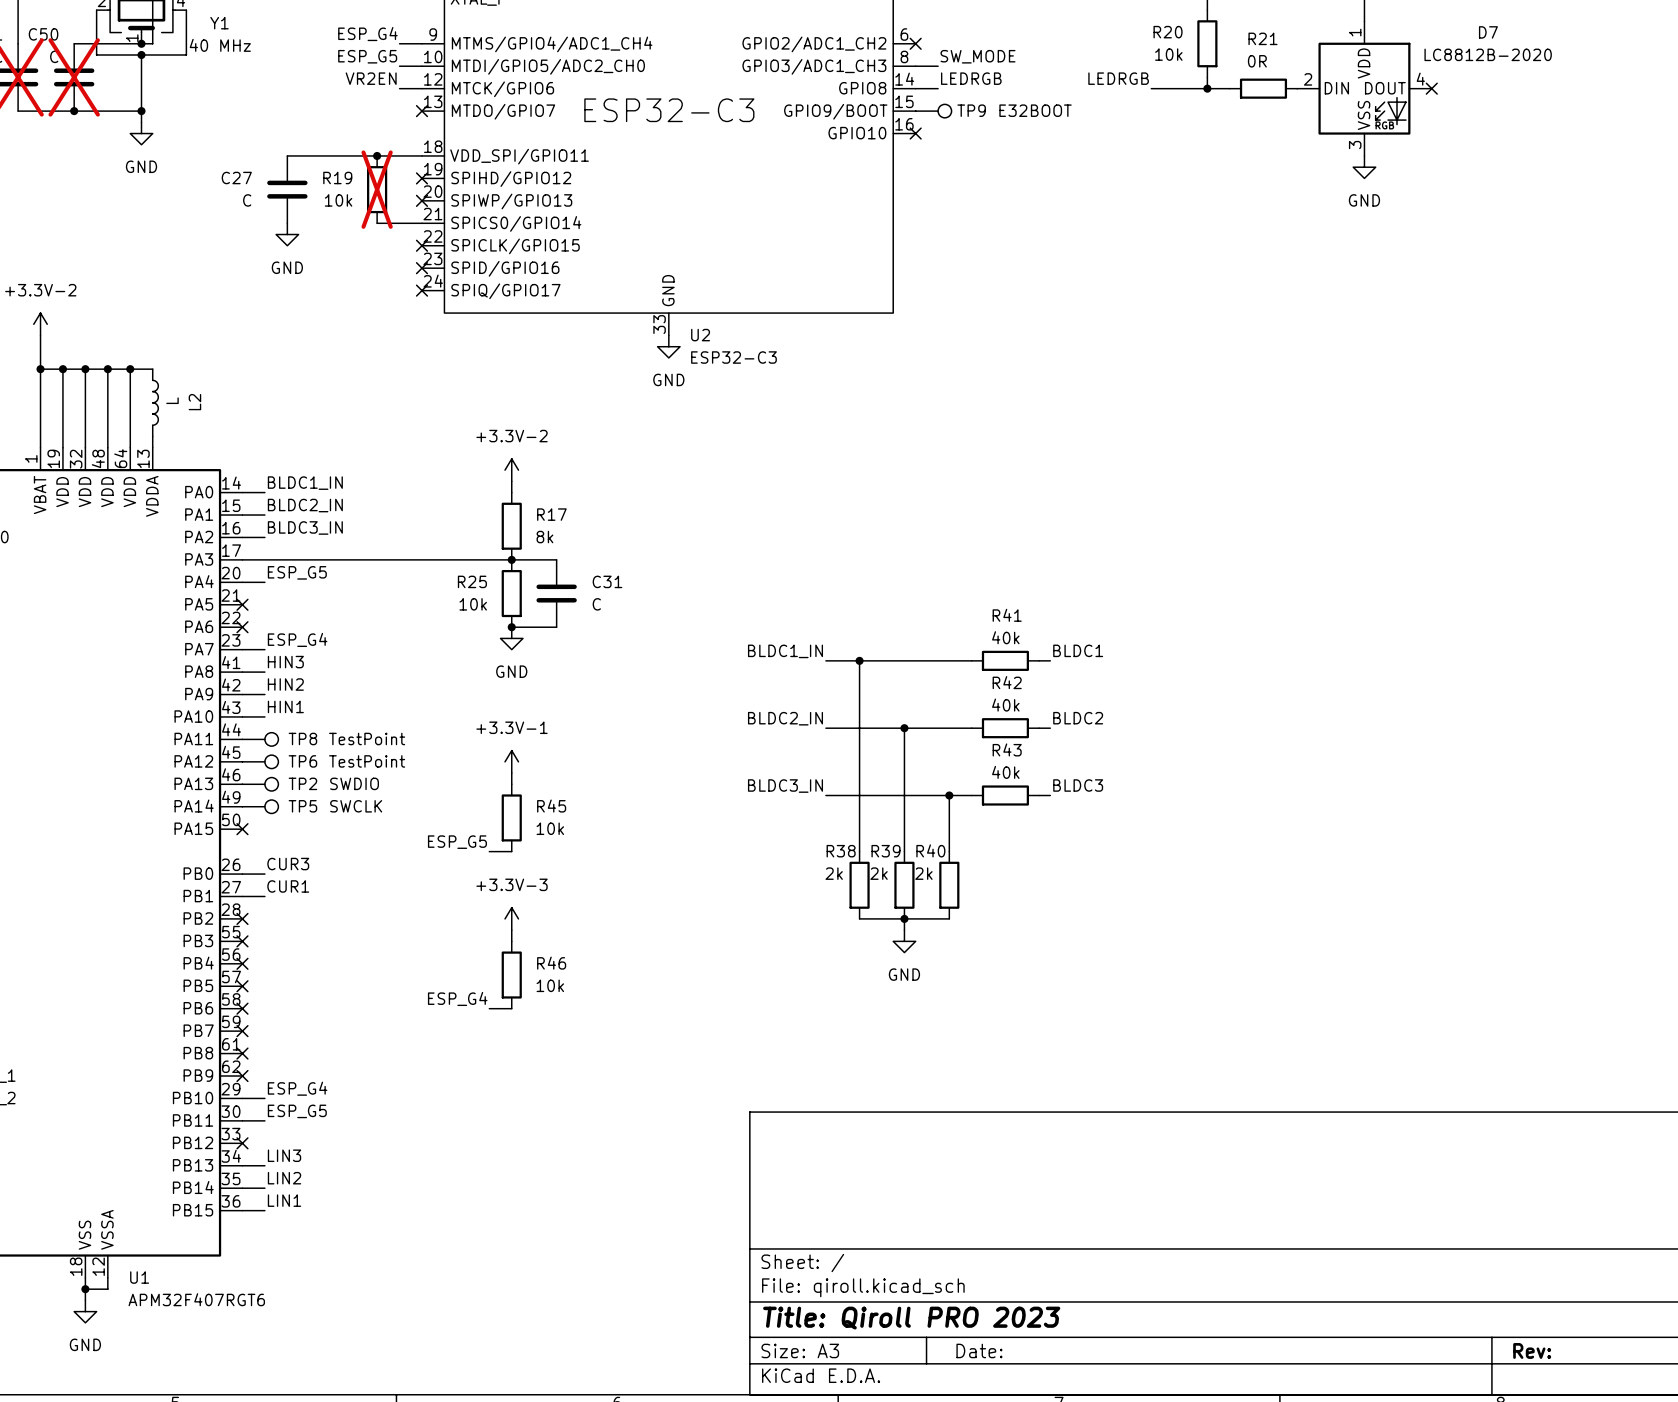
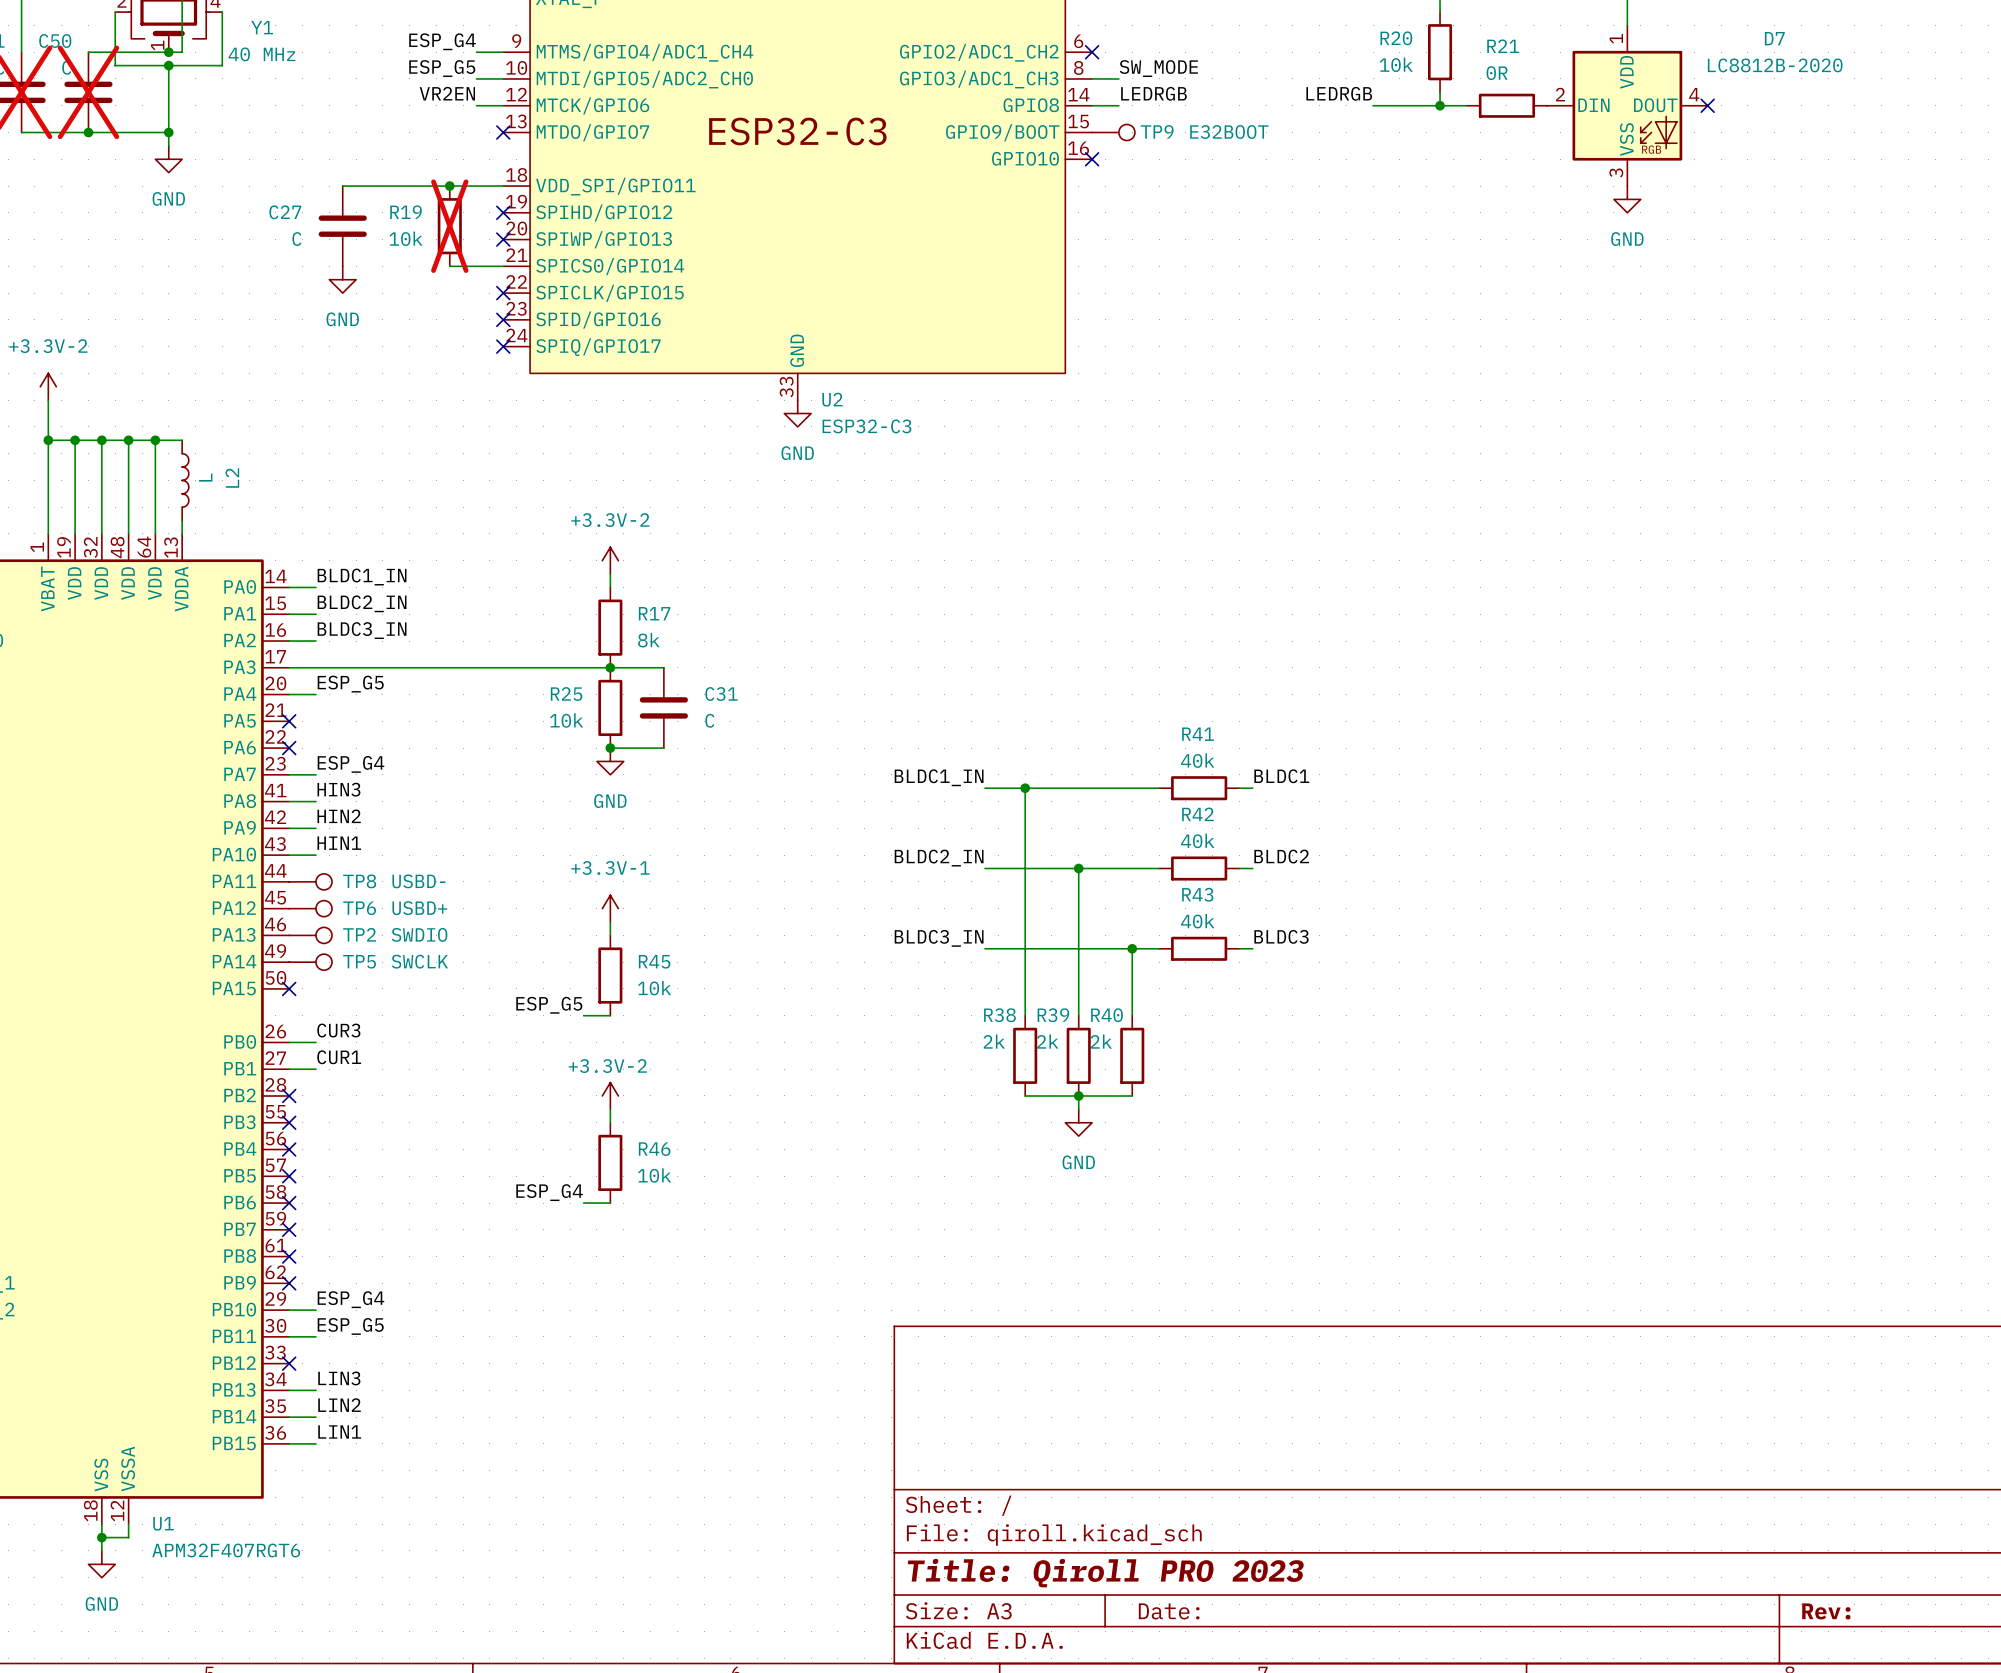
TP8 value: TestPoint (367, 738) -> USBD- (418, 881)
TP6 value: TestPoint (367, 761) -> USBD+ (419, 908)
power symbol: +3.3V-3 (511, 918) -> +3.3V-2 (610, 1095)

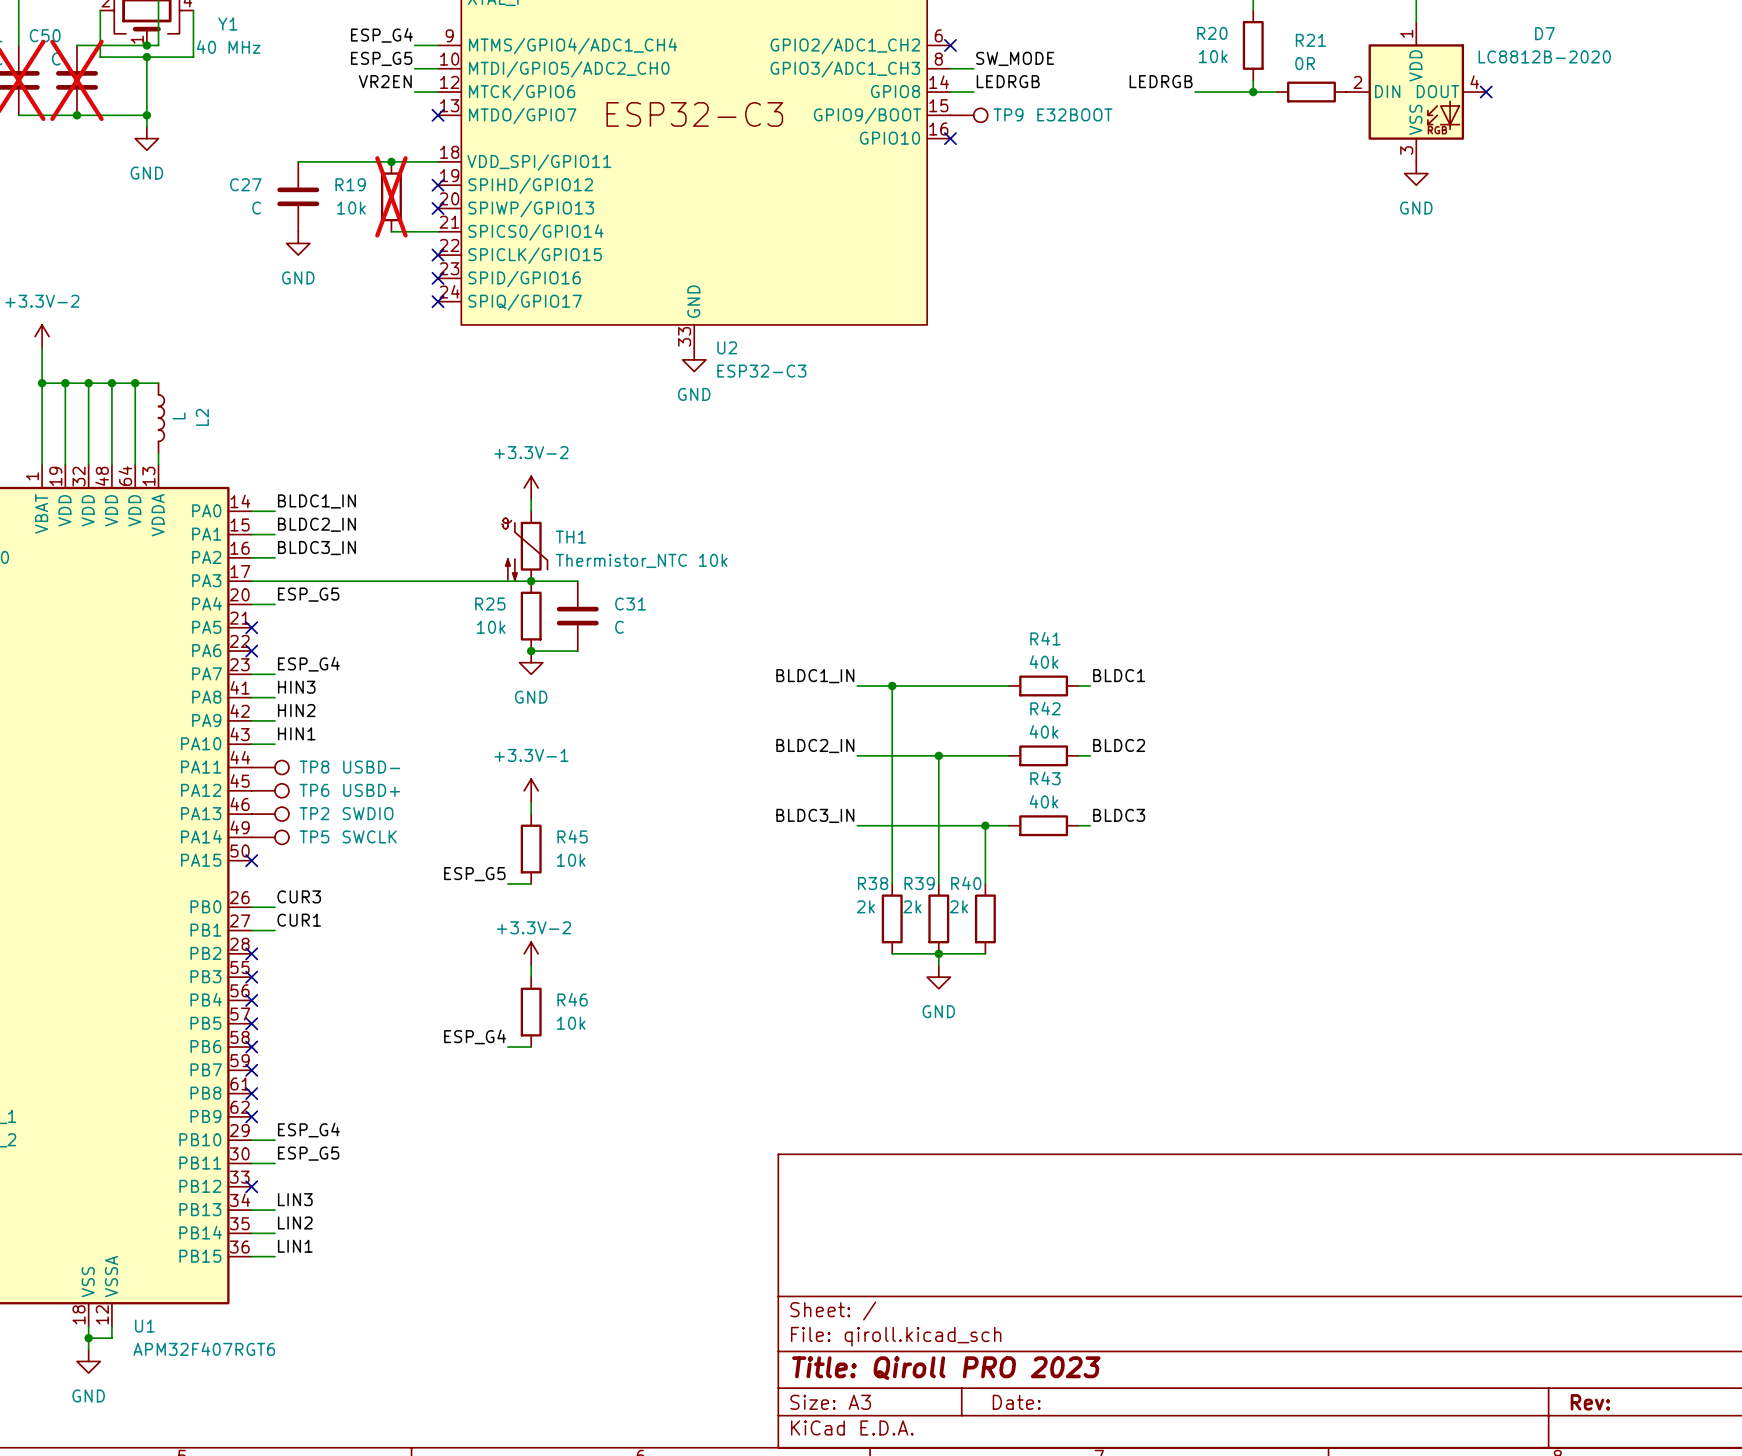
TH1: none -> Thermistor_NTC 10k (524, 546)
R17: 8k (610, 627) -> none

